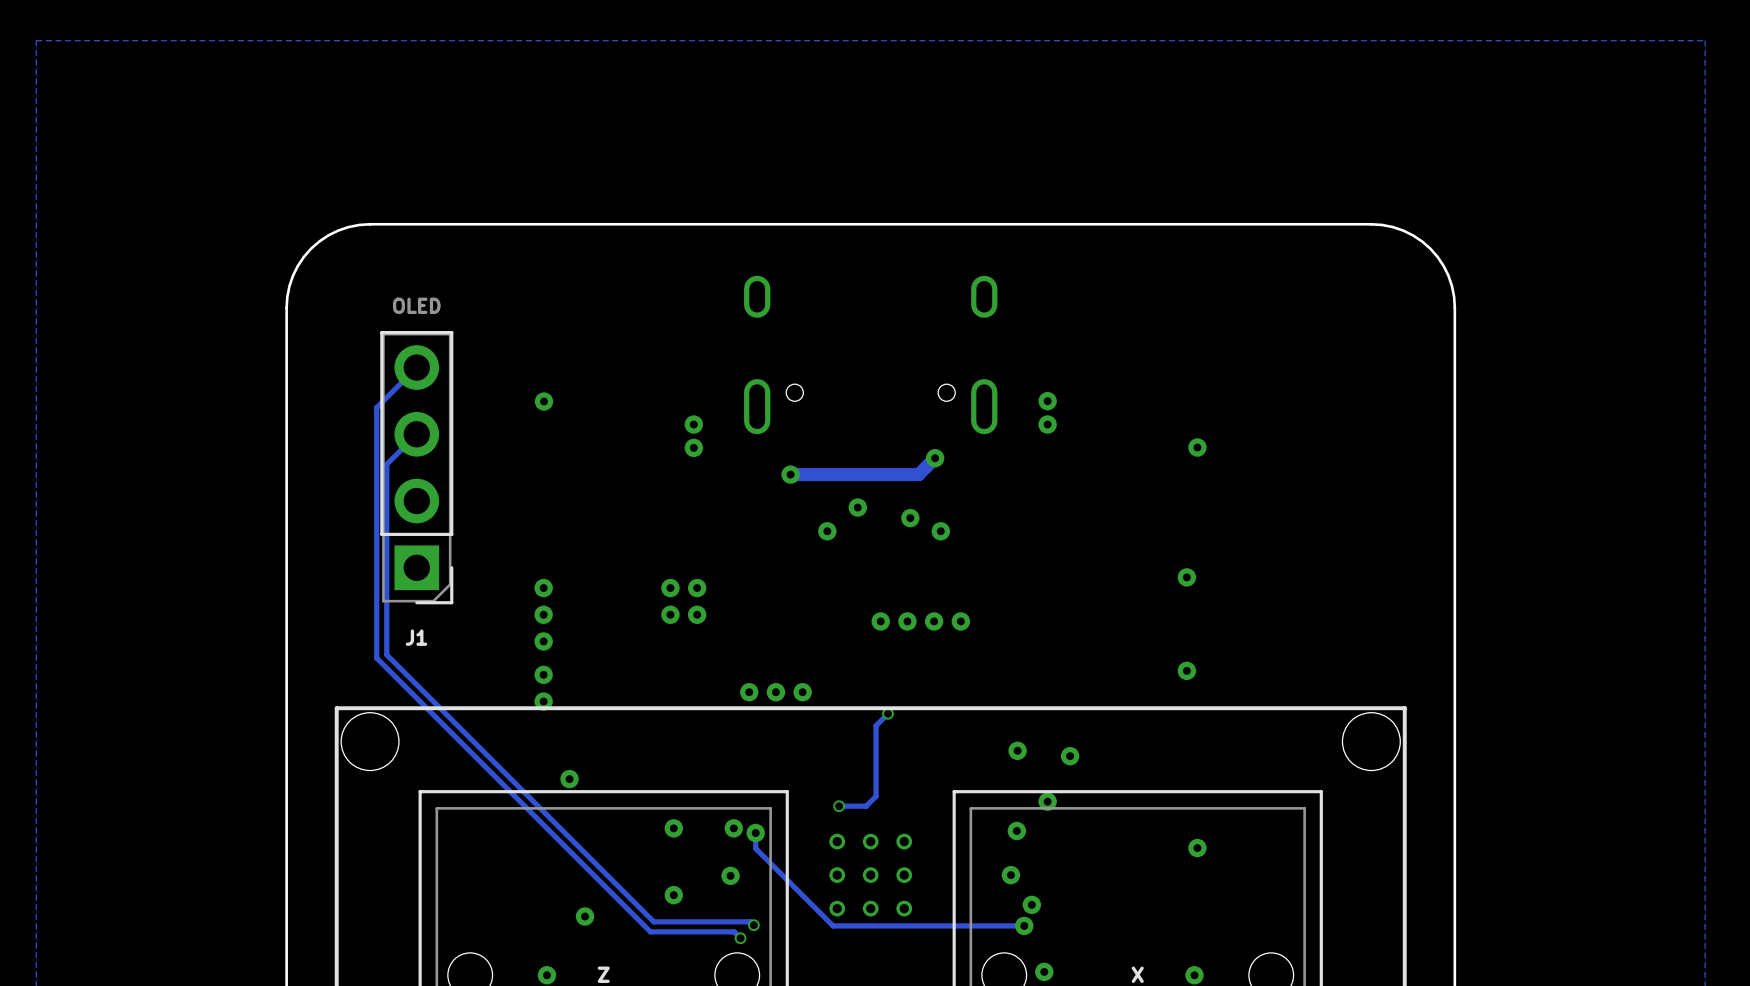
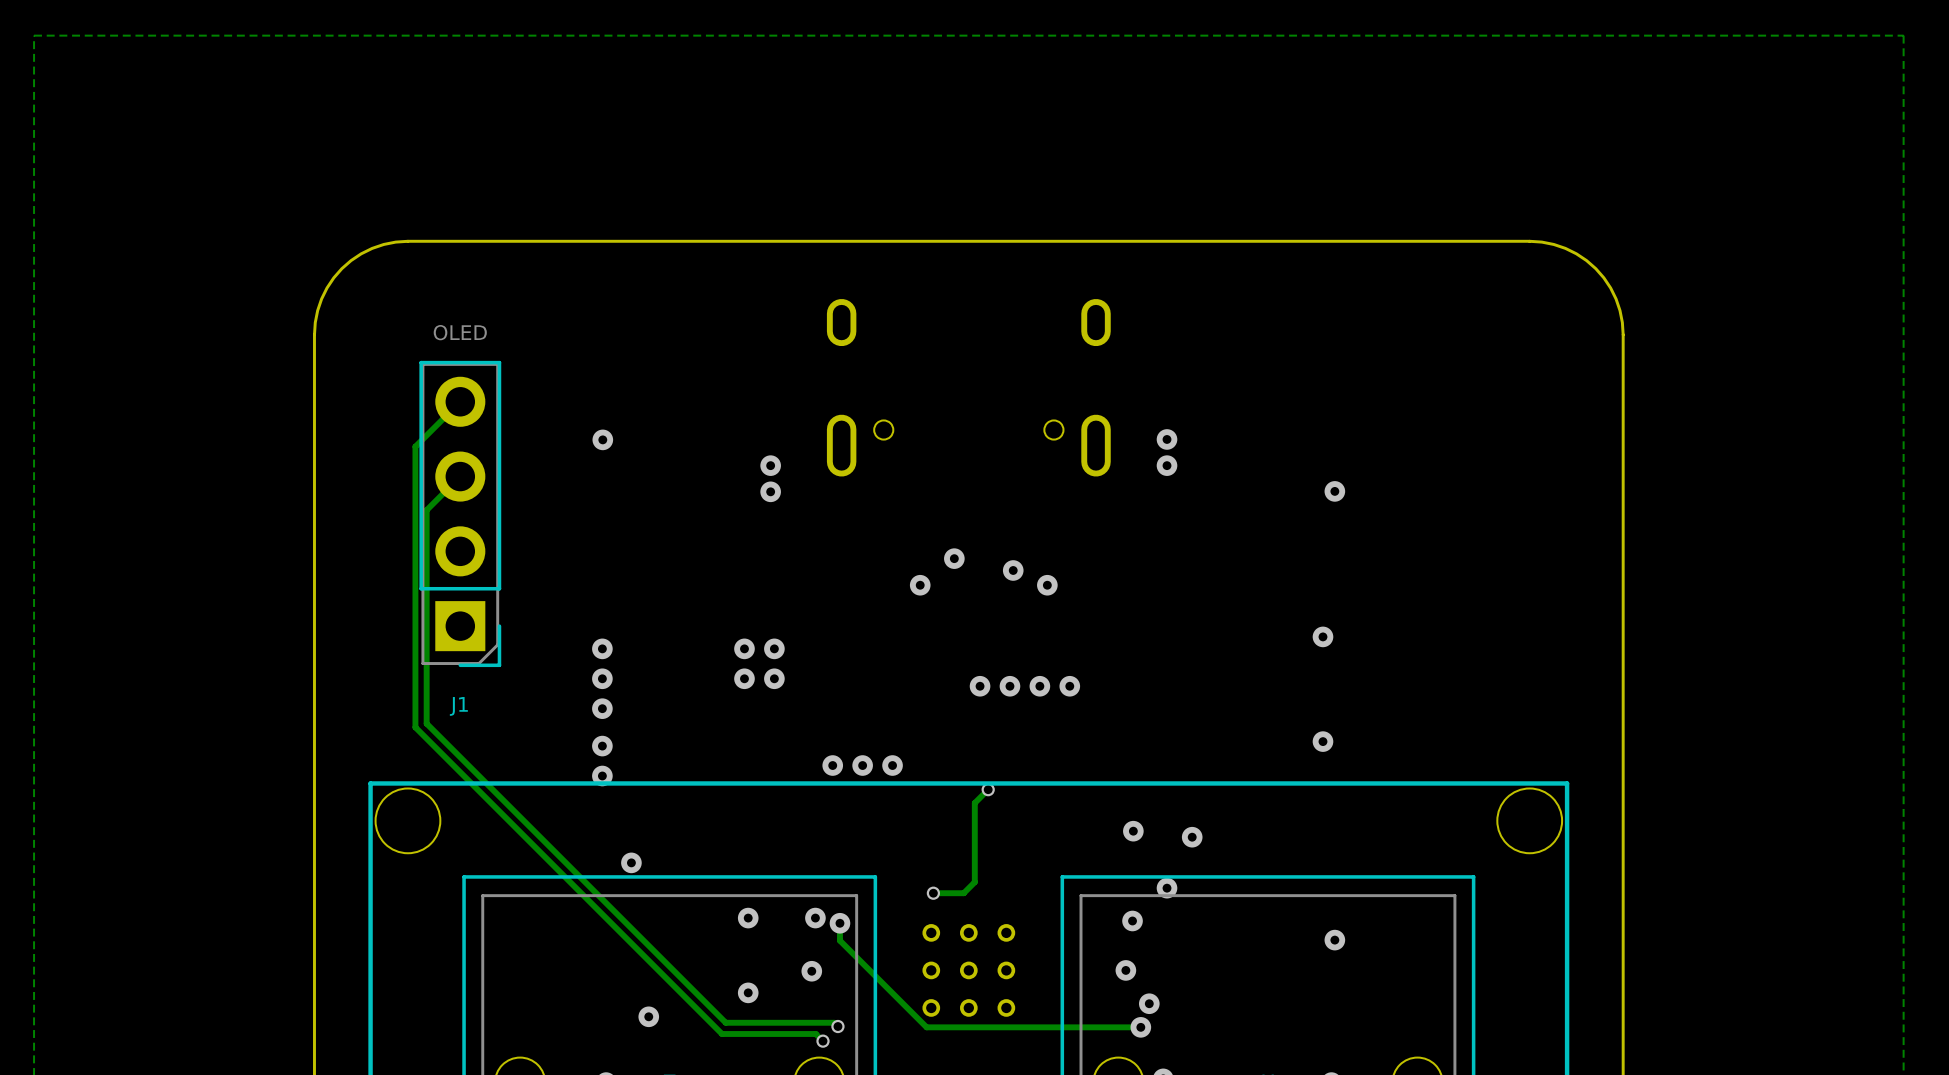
track: (935, 458) (918, 474) (790, 474) -> none
via: (935, 458) -> none
via: (790, 474) -> none

